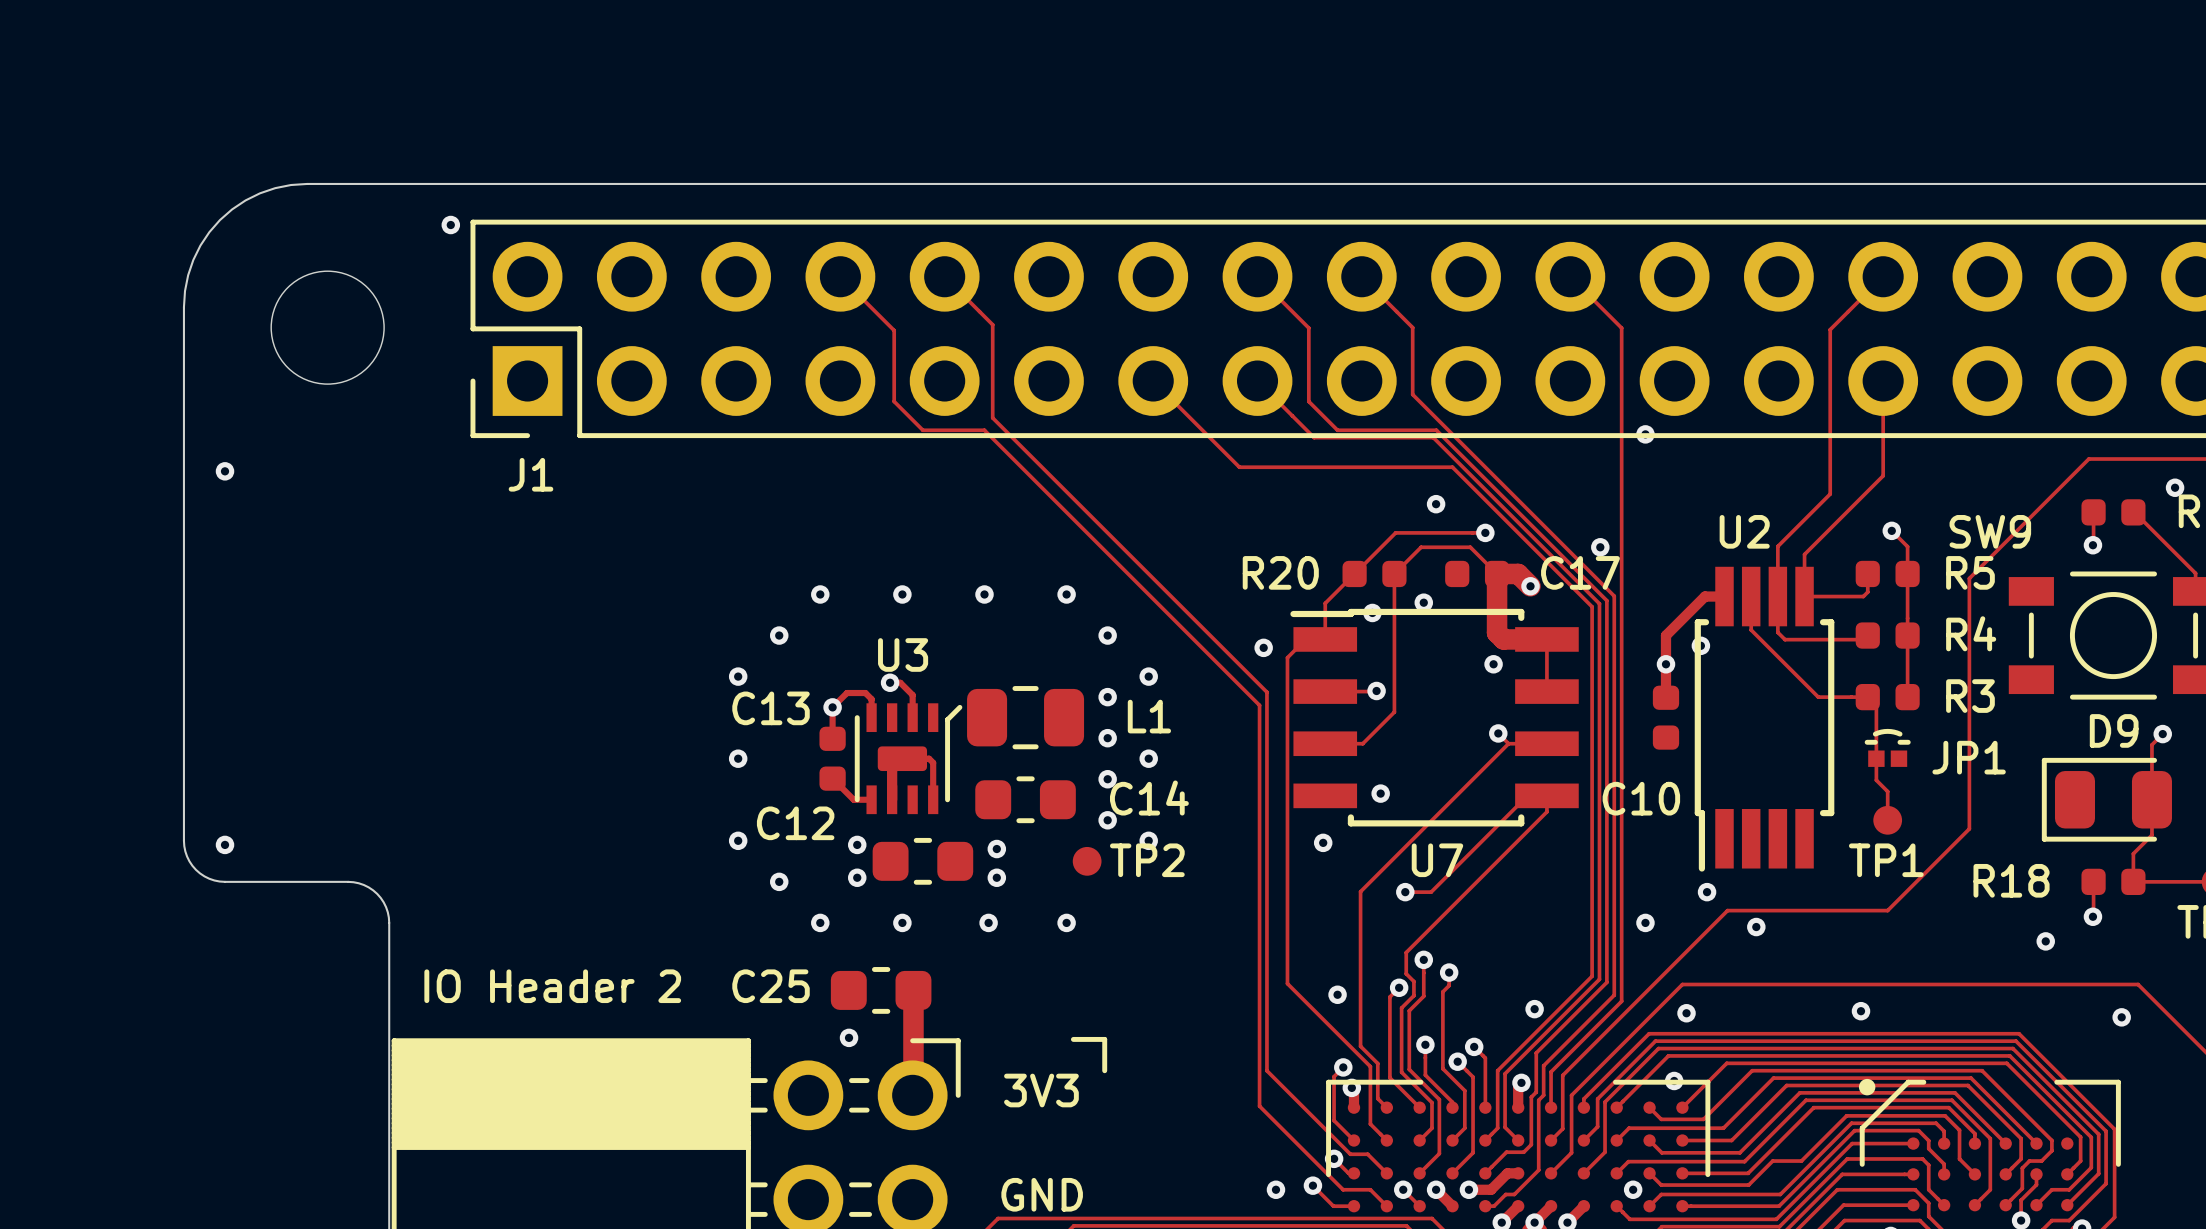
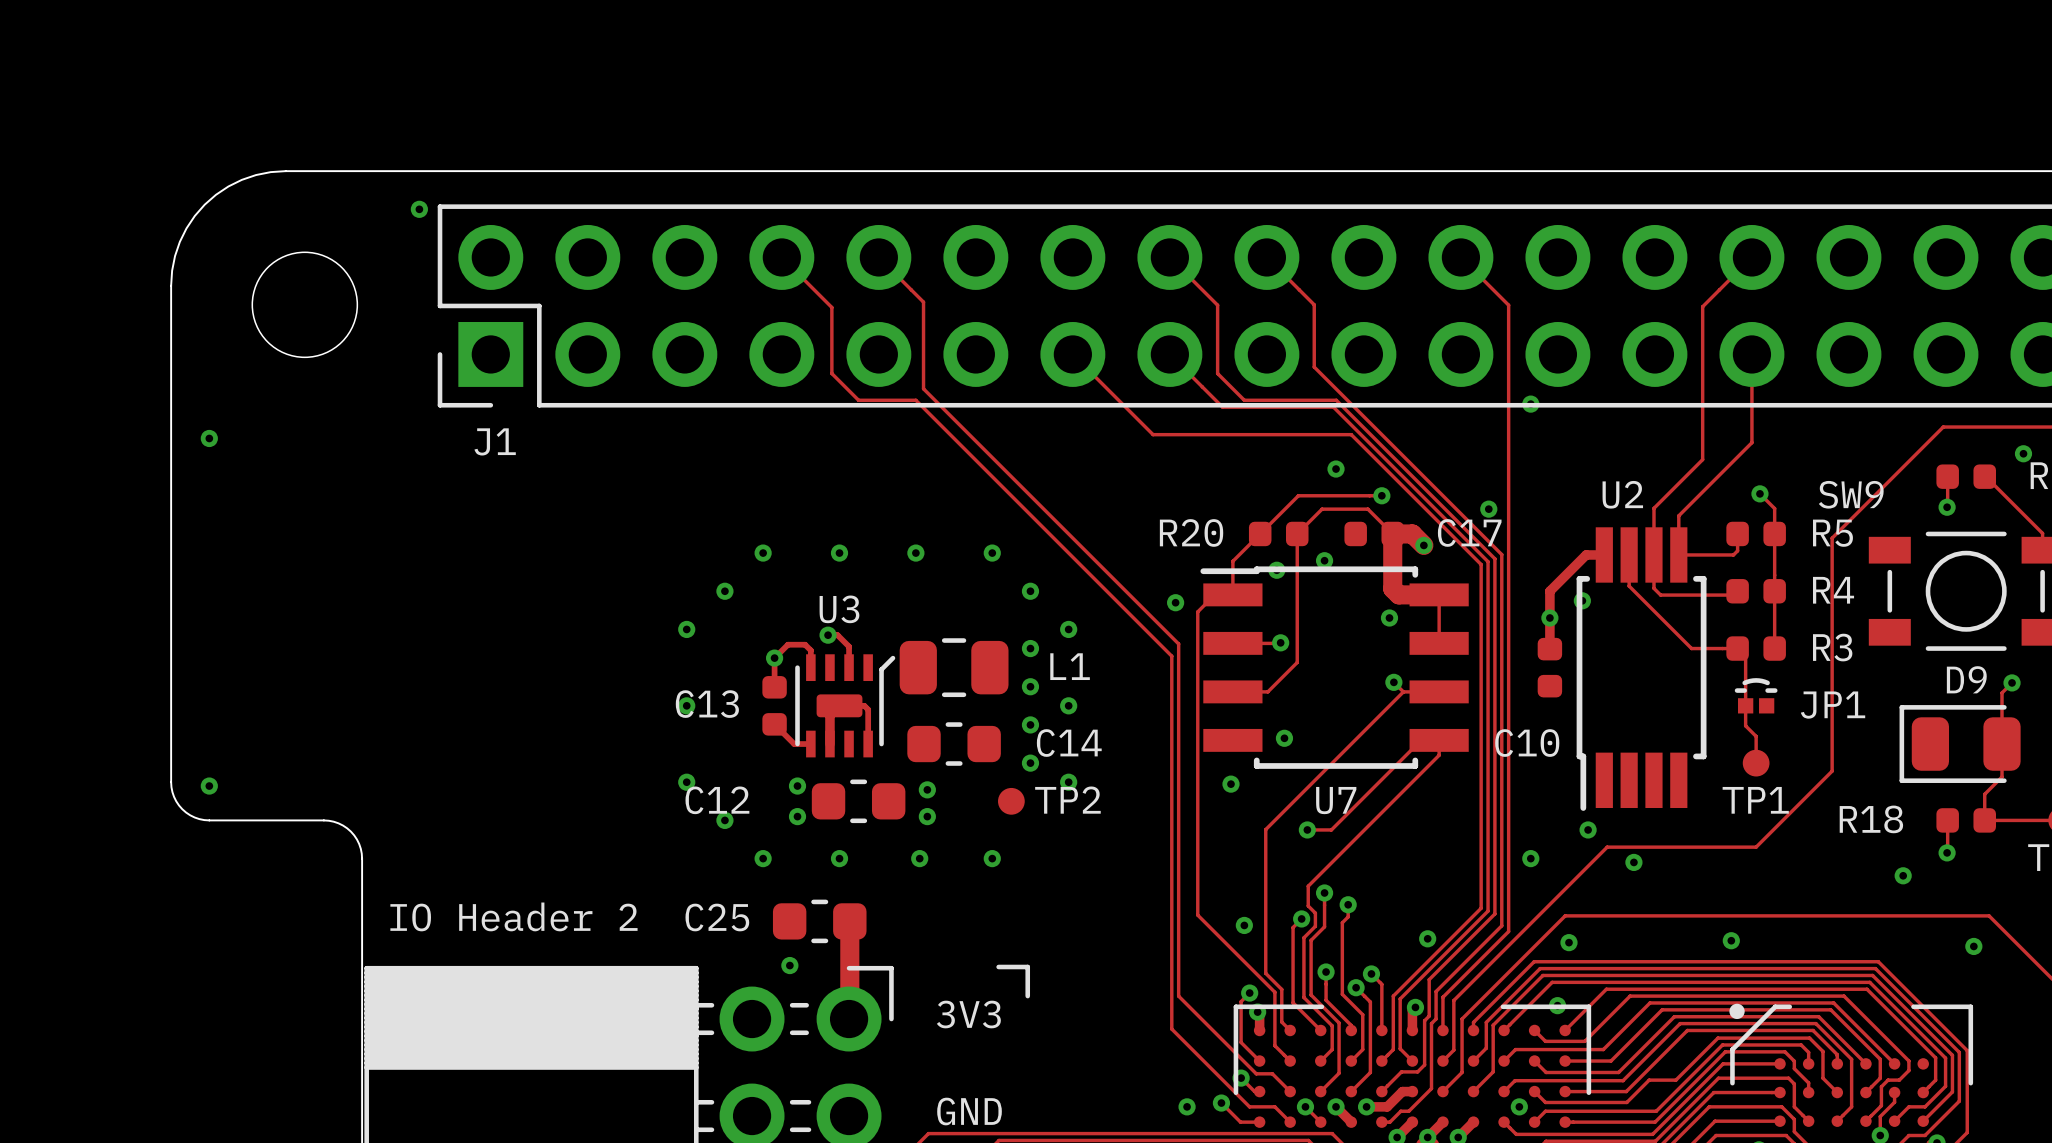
C13 name position: C13 (771, 708) -> C13 (707, 704)
C12 name position: C12 (795, 823) -> C12 (717, 800)

